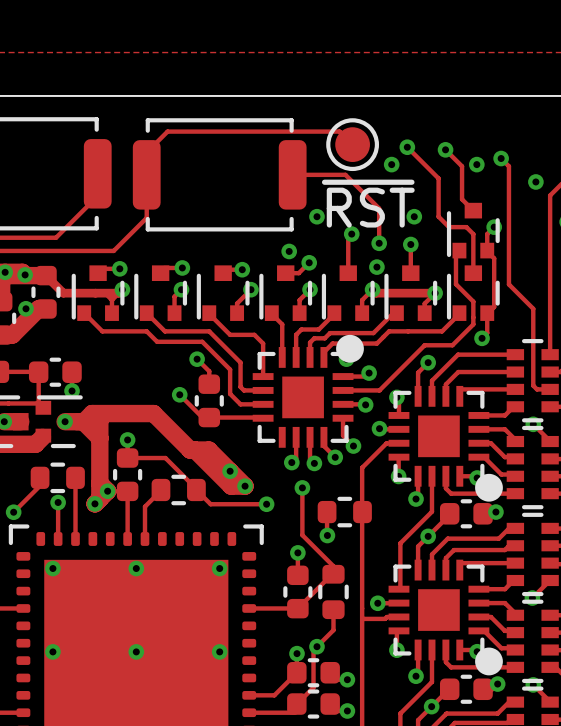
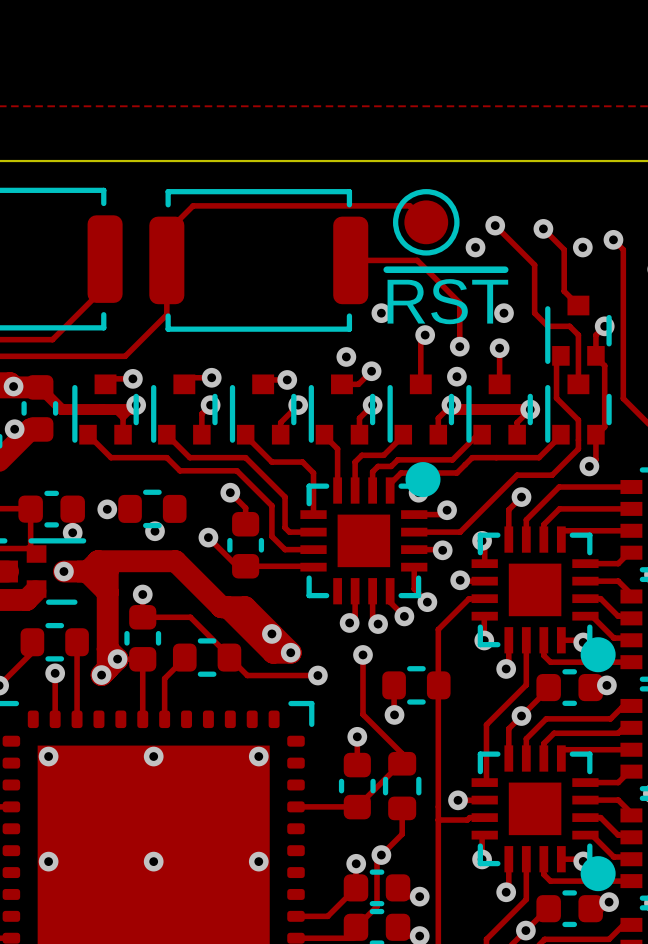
via: none -> (107, 509)
part: none -> (152, 508)
via: none -> (155, 531)

